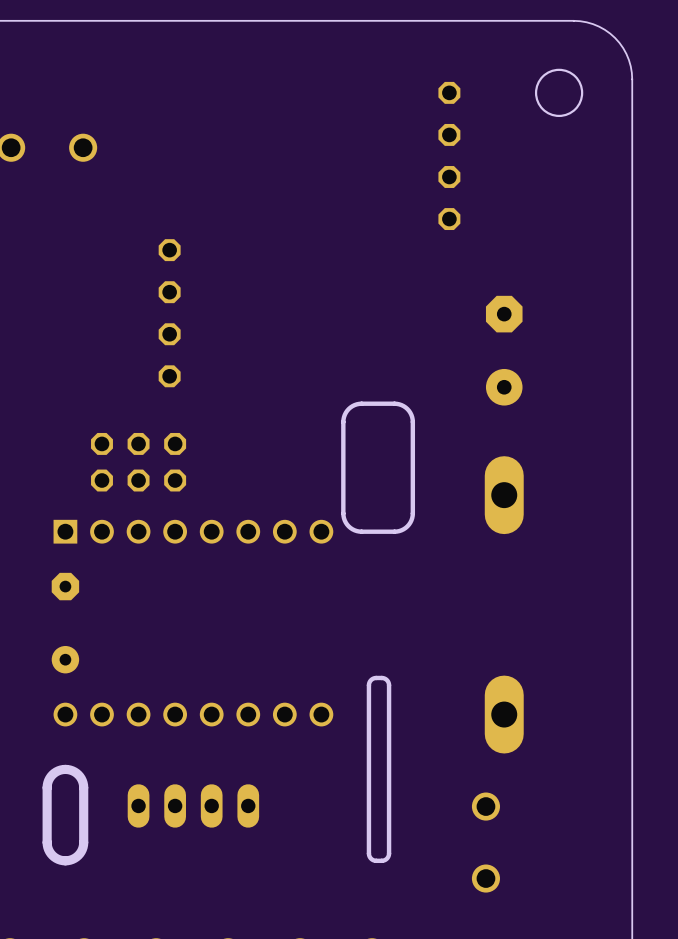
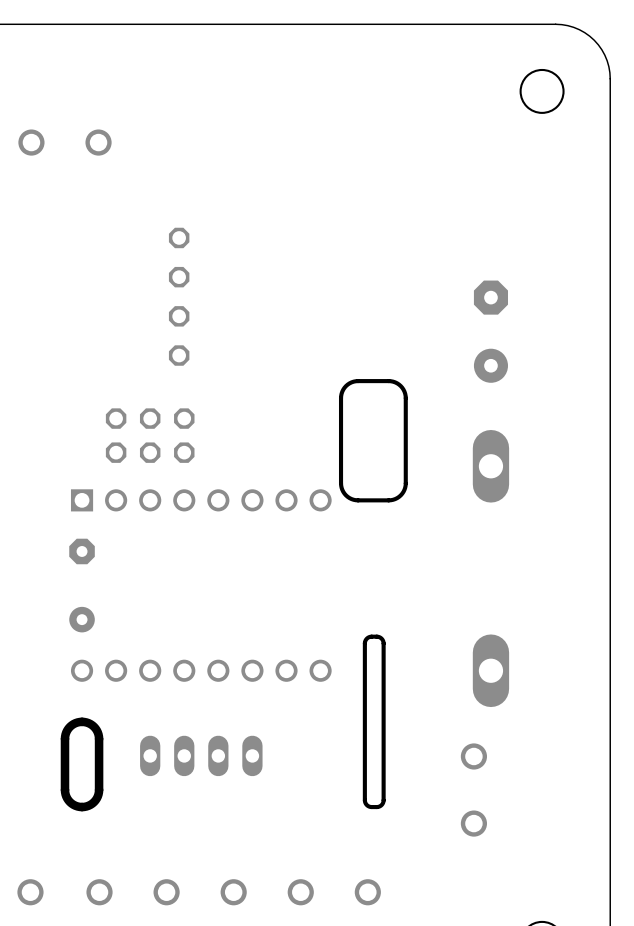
part: (449, 92) -> none
part: (449, 134) -> none
part: (449, 176) -> none
part: (449, 219) -> none

